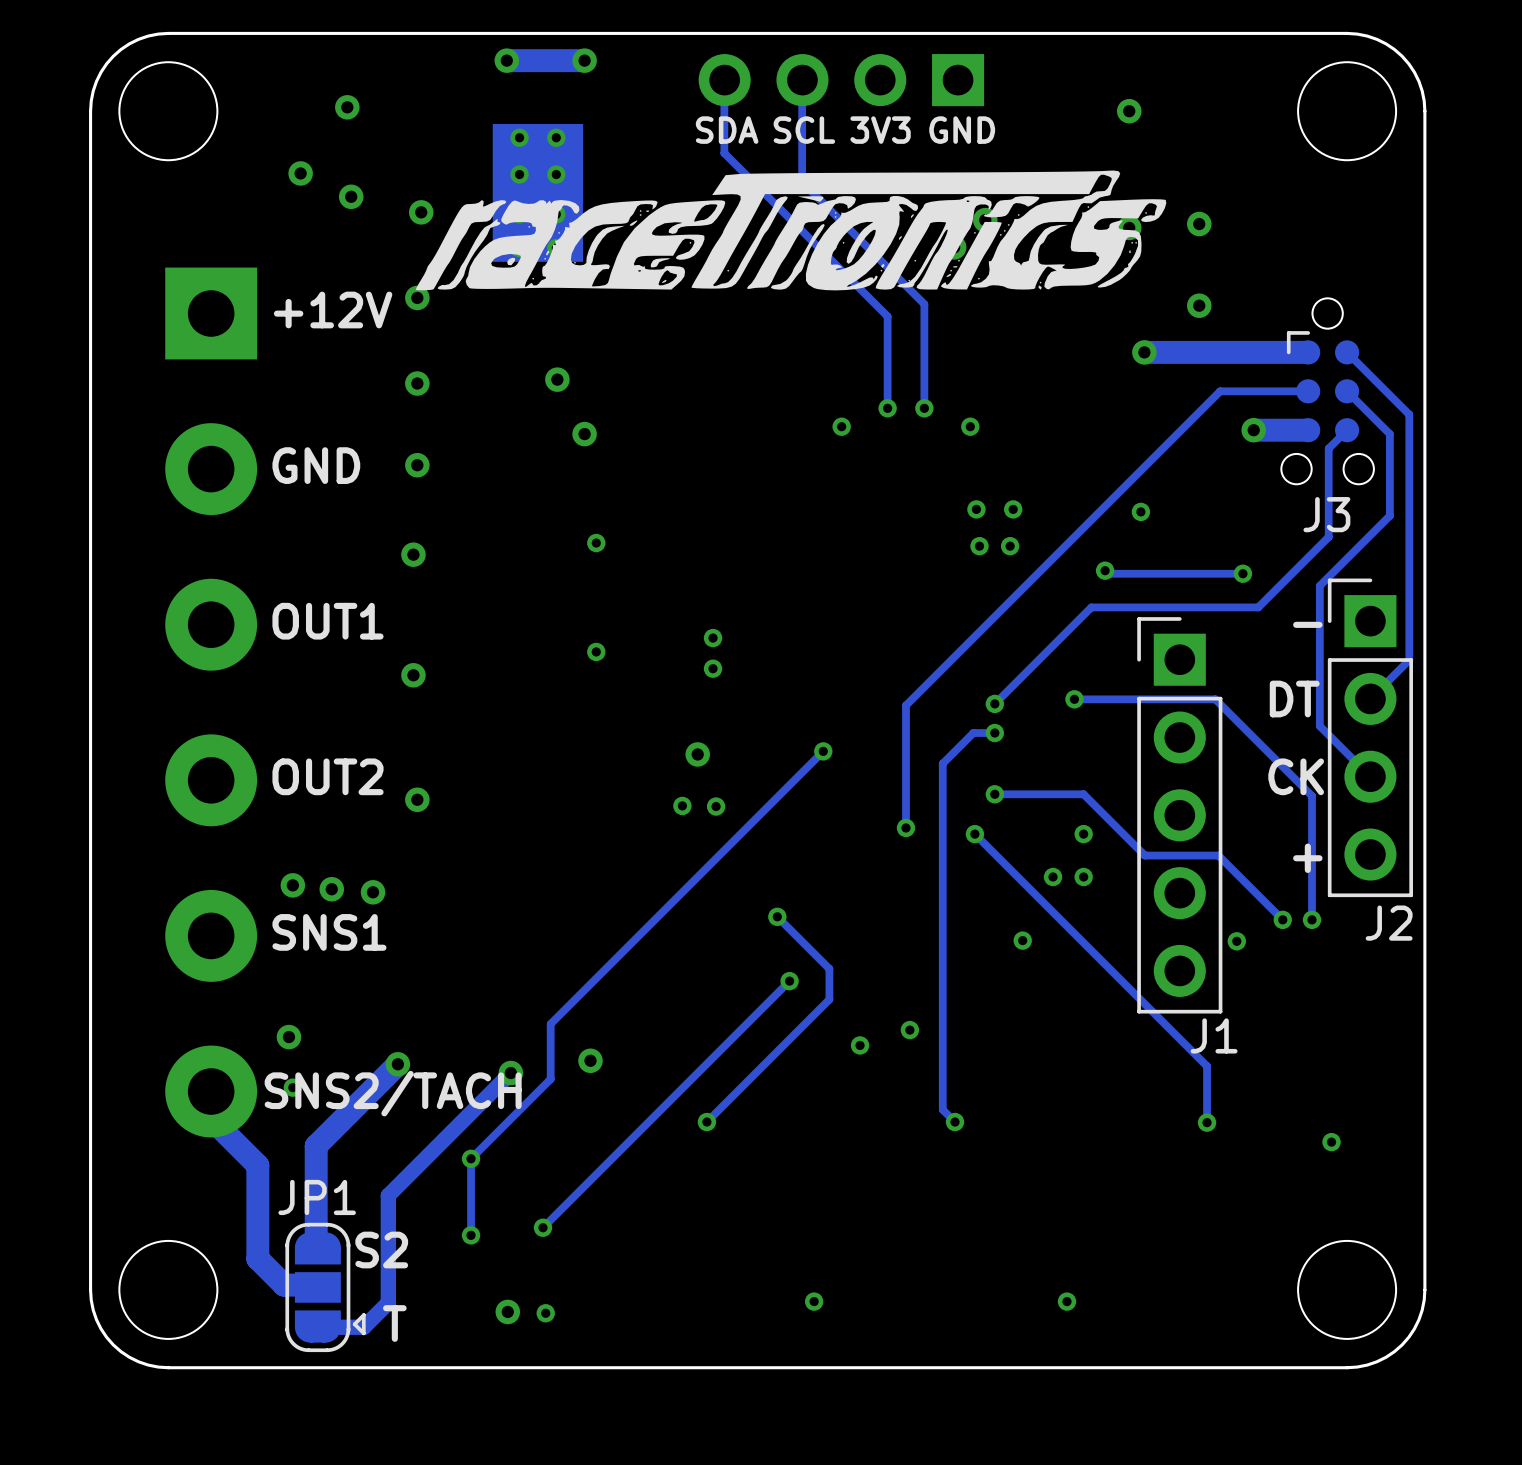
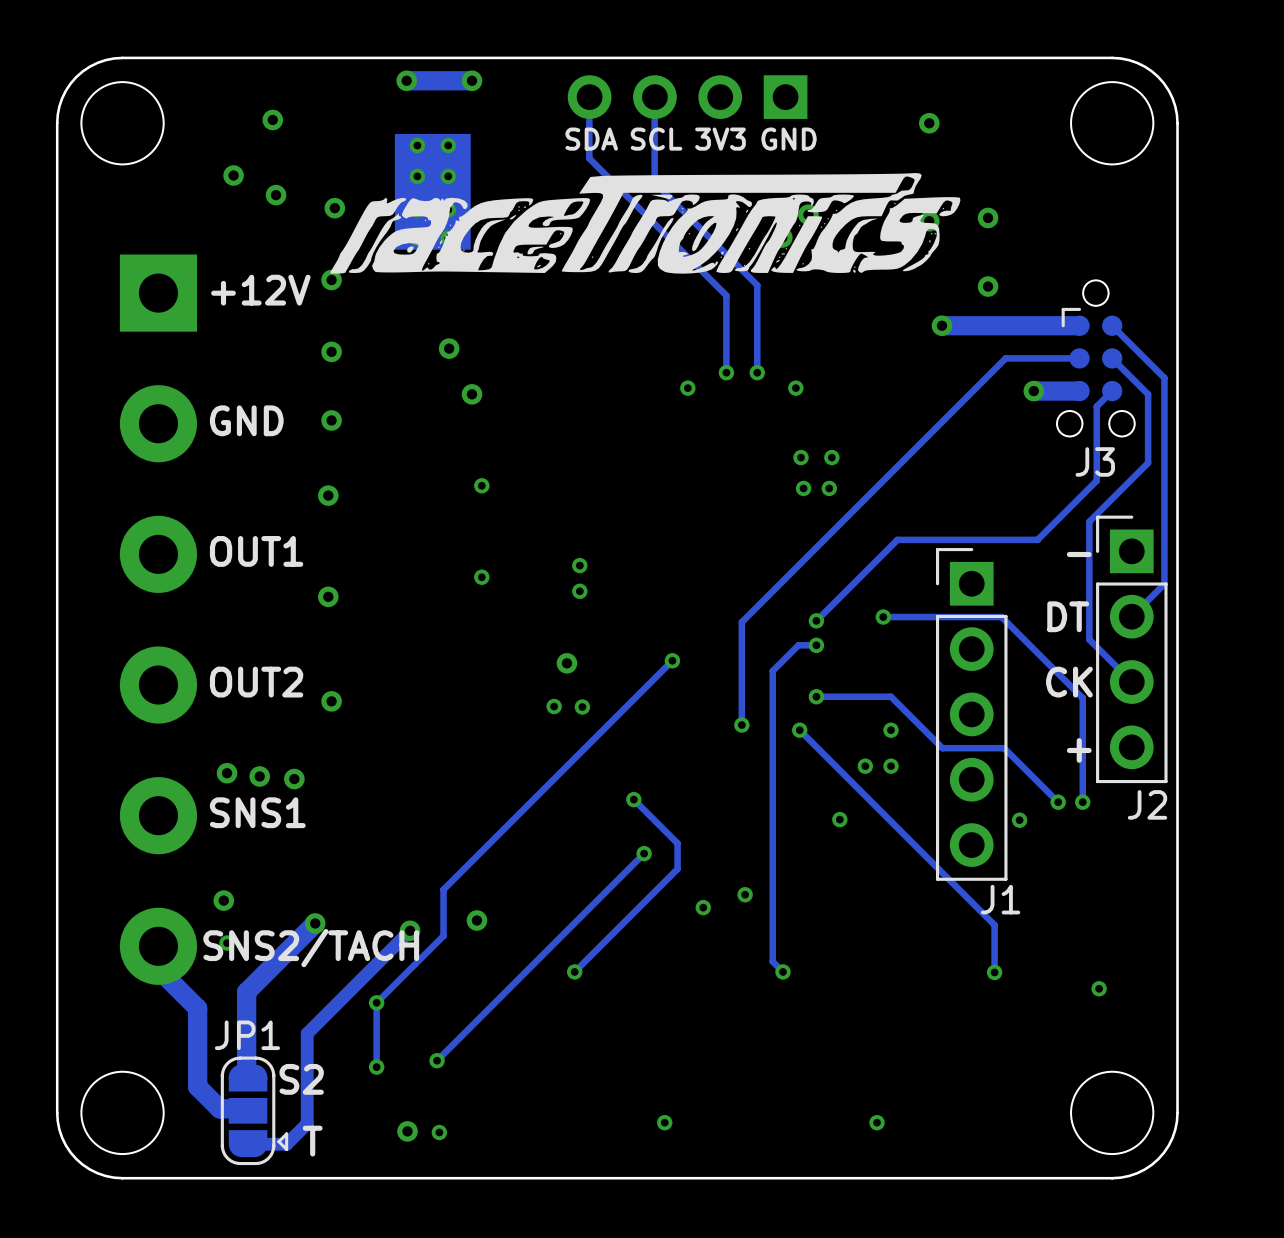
via: (1140, 511) -> none
track: (1105, 570) (1108, 573) (1242, 573) -> none
via: (1105, 570) -> none
via: (1242, 573) -> none

